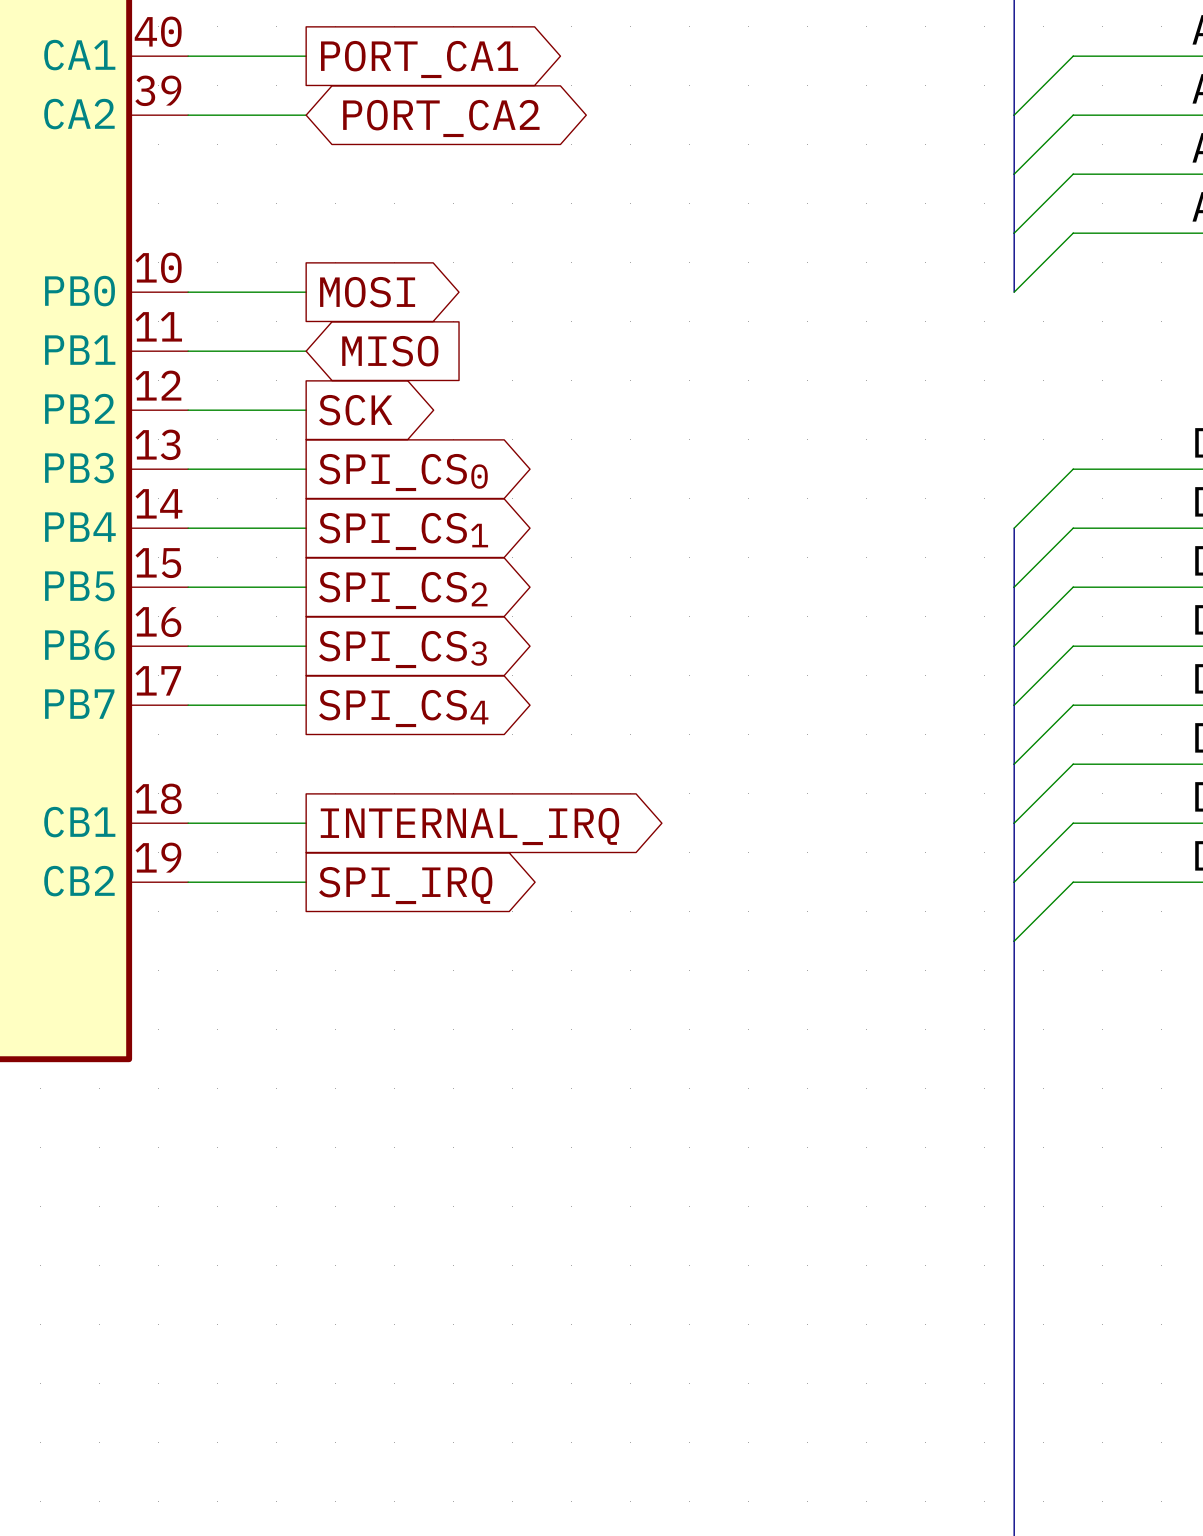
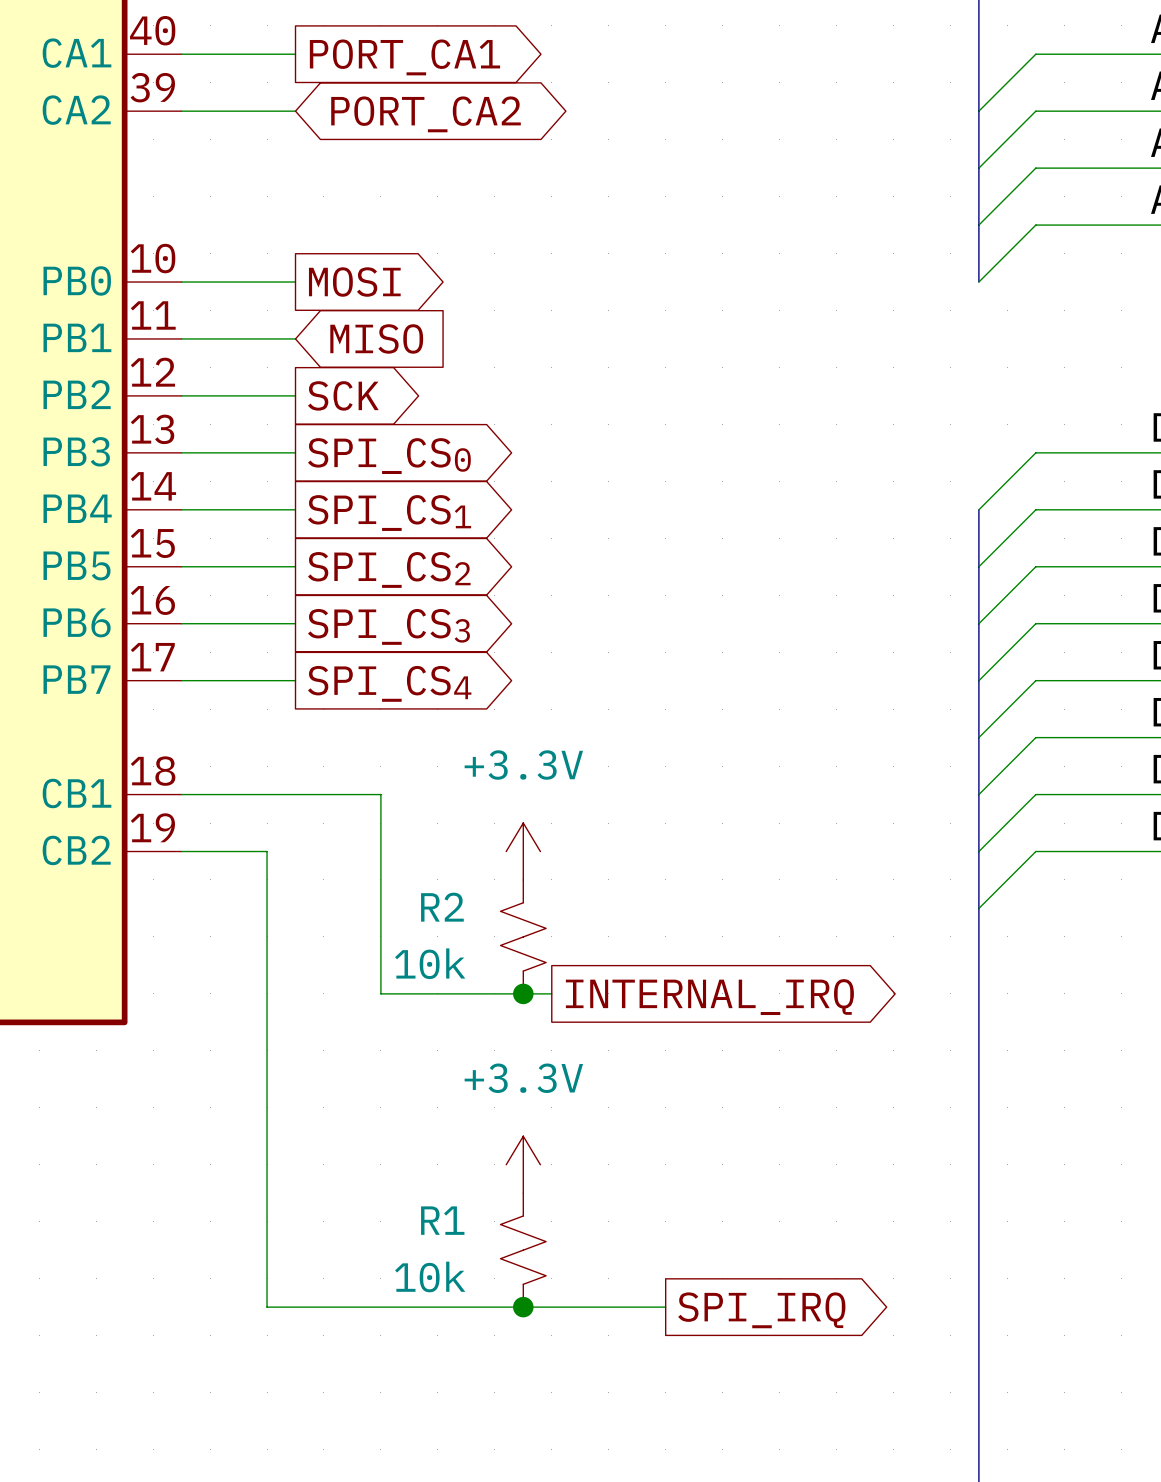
wire: none -> (295, 794) (380, 794) (380, 993) (551, 993)
global label position: INTERNAL_IRQ (469, 826) -> INTERNAL_IRQ (709, 997)
wire: (276, 882) (306, 882) -> (267, 851) (267, 1307) (665, 1307)
power symbol: none -> +3.3V (523, 851)
global label: SPI_IRQ (405, 885) -> none
R2: none -> 10k (523, 936)
junction: none -> (523, 993)
power symbol: none -> +3.3V (523, 1164)
R1: none -> 10k (523, 1250)
junction: none -> (523, 1307)
global label: none -> SPI_IRQ (761, 1310)

